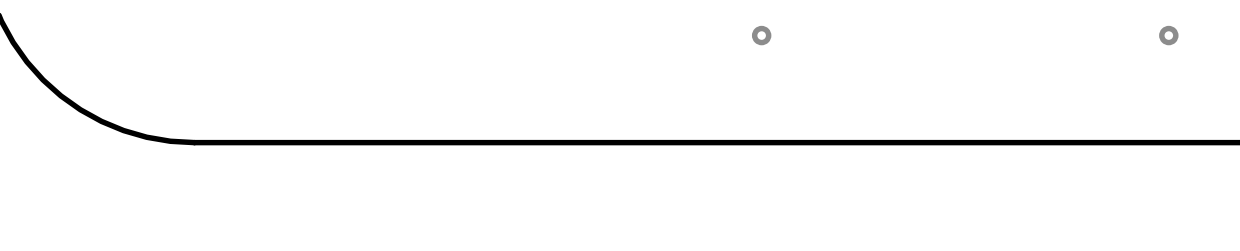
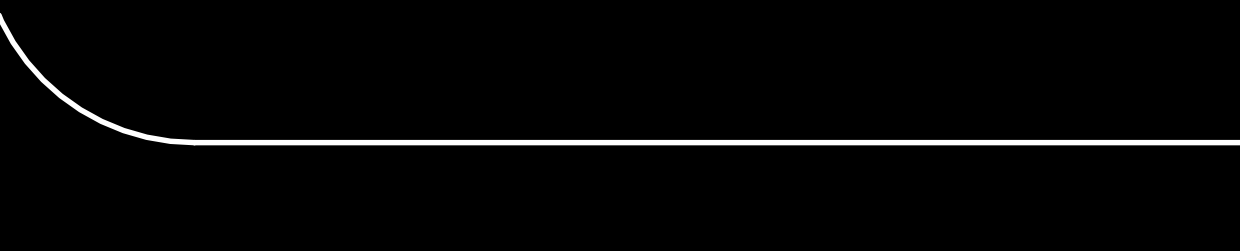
via: (761, 35) -> none
via: (1168, 35) -> none

